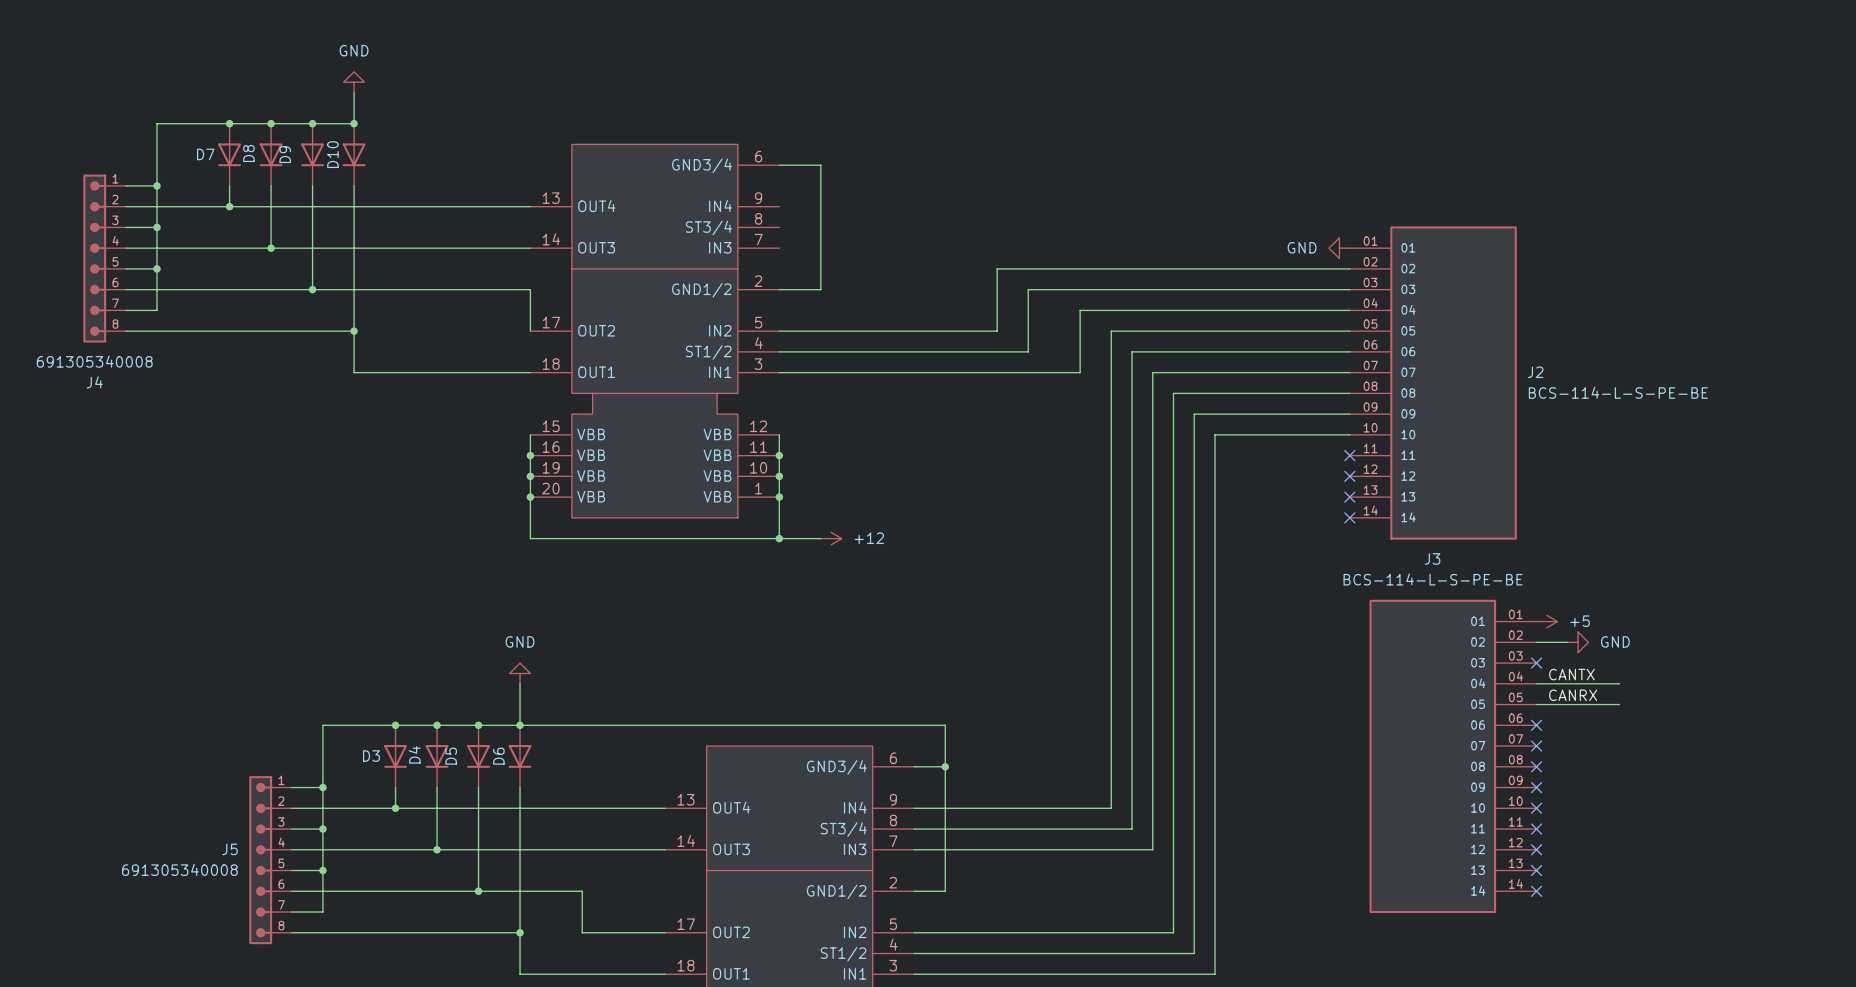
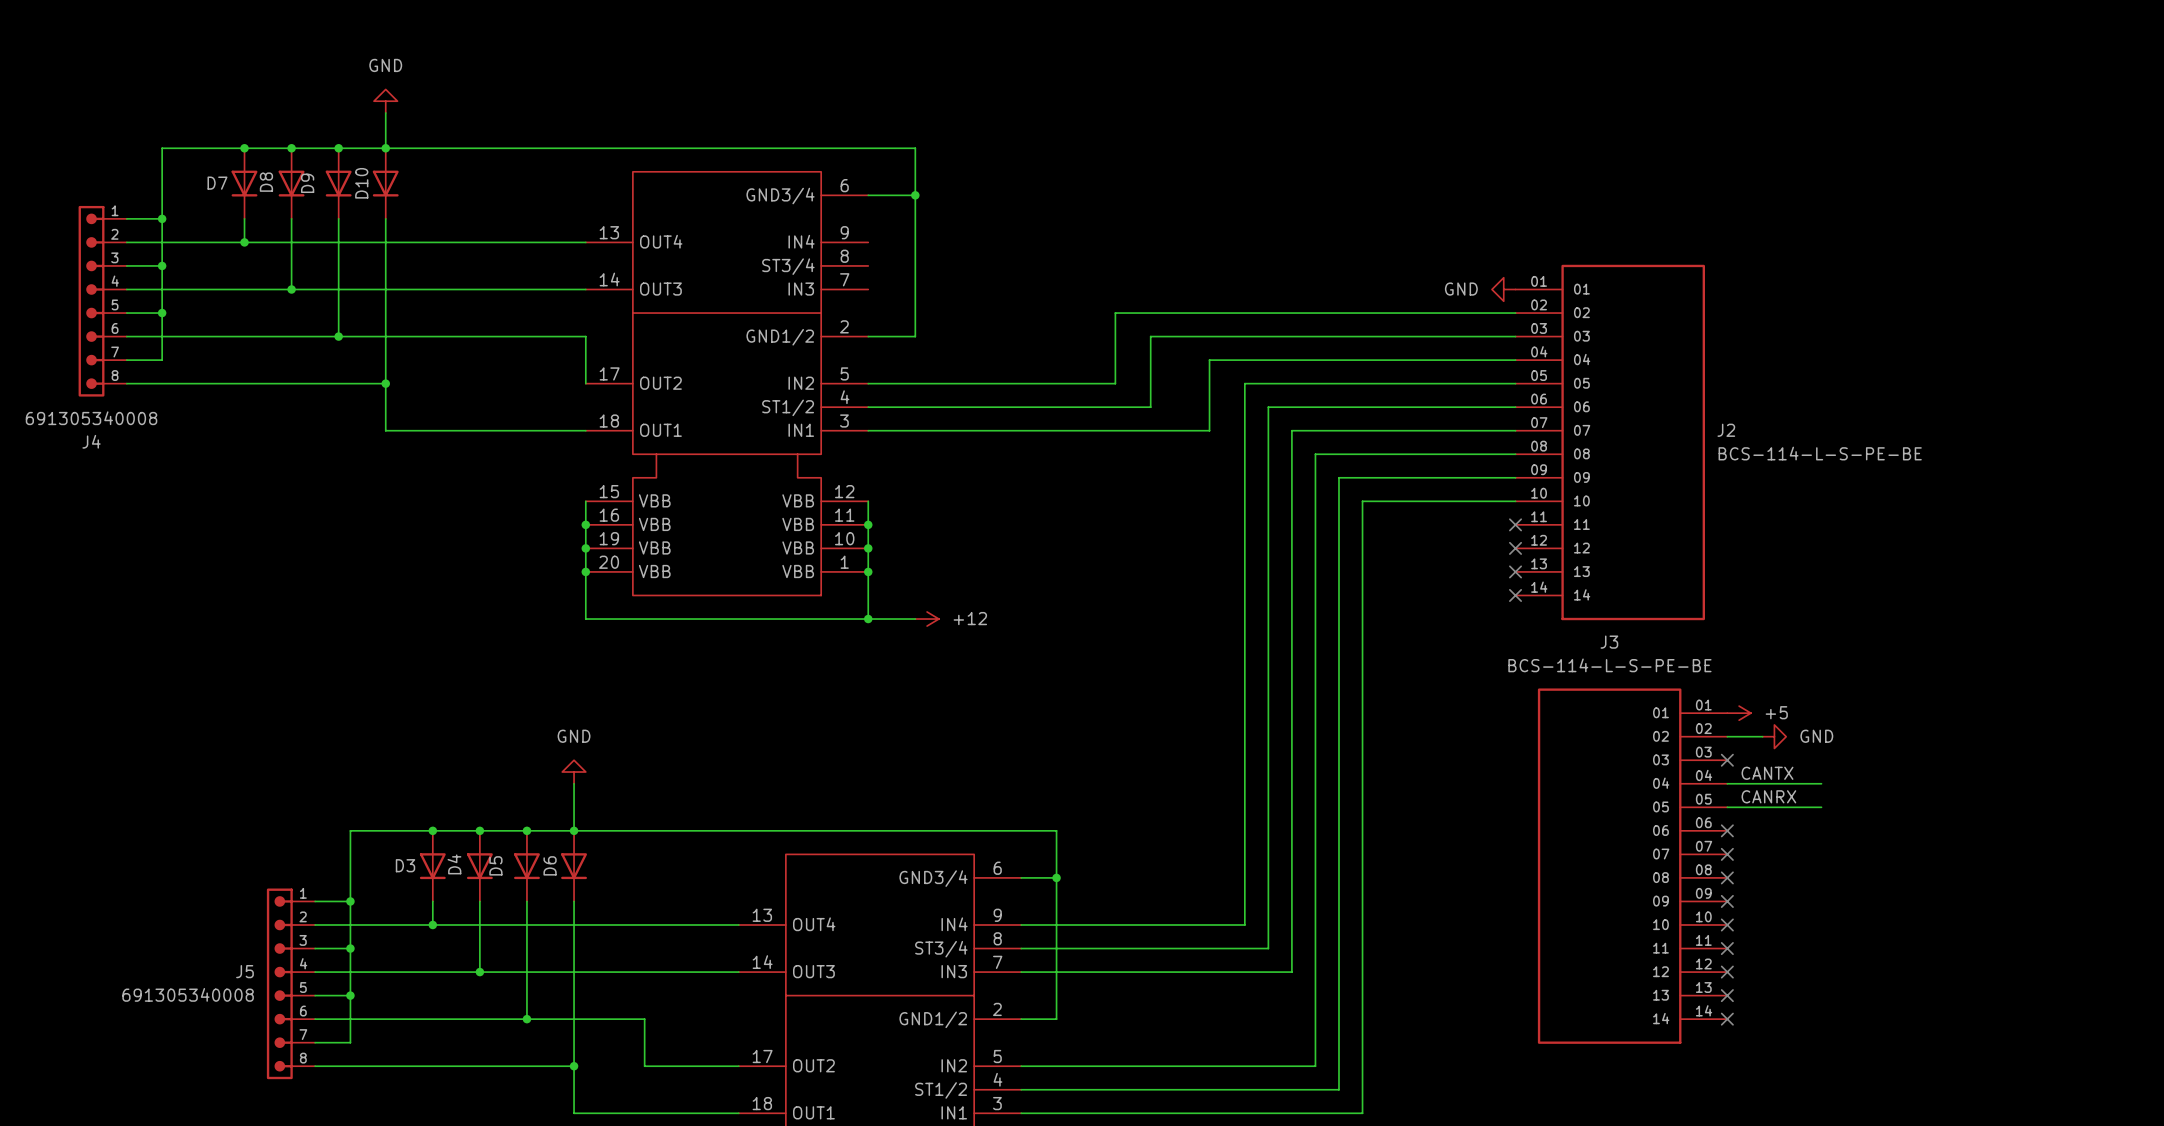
wire: none -> (385, 148) (915, 148) (915, 195)
junction: none -> (915, 195)

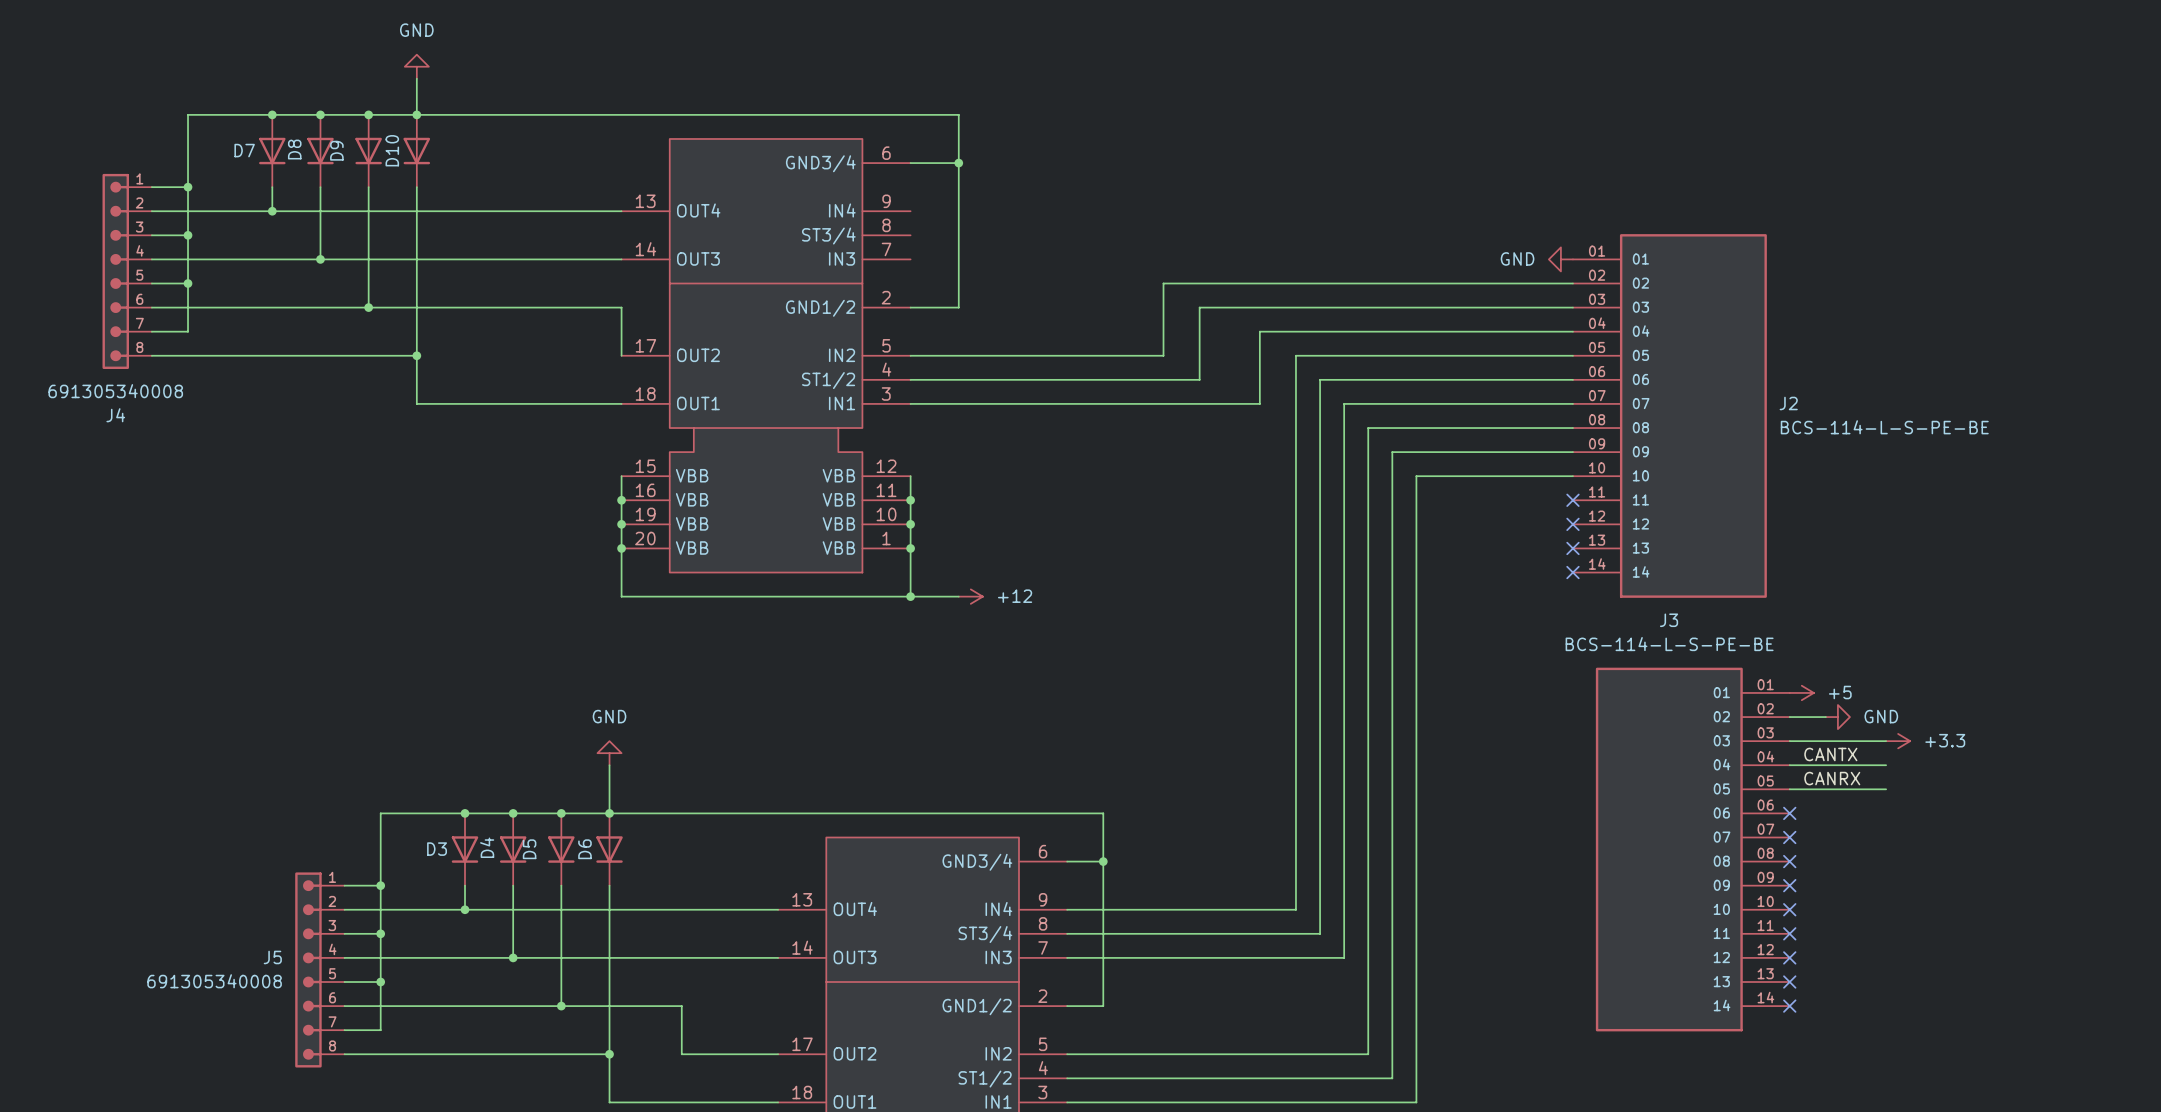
wire: none -> (1789, 741) (1886, 741)
no-connect mark: (1727, 760) -> none
power symbol: none -> +3.3 (1898, 741)

